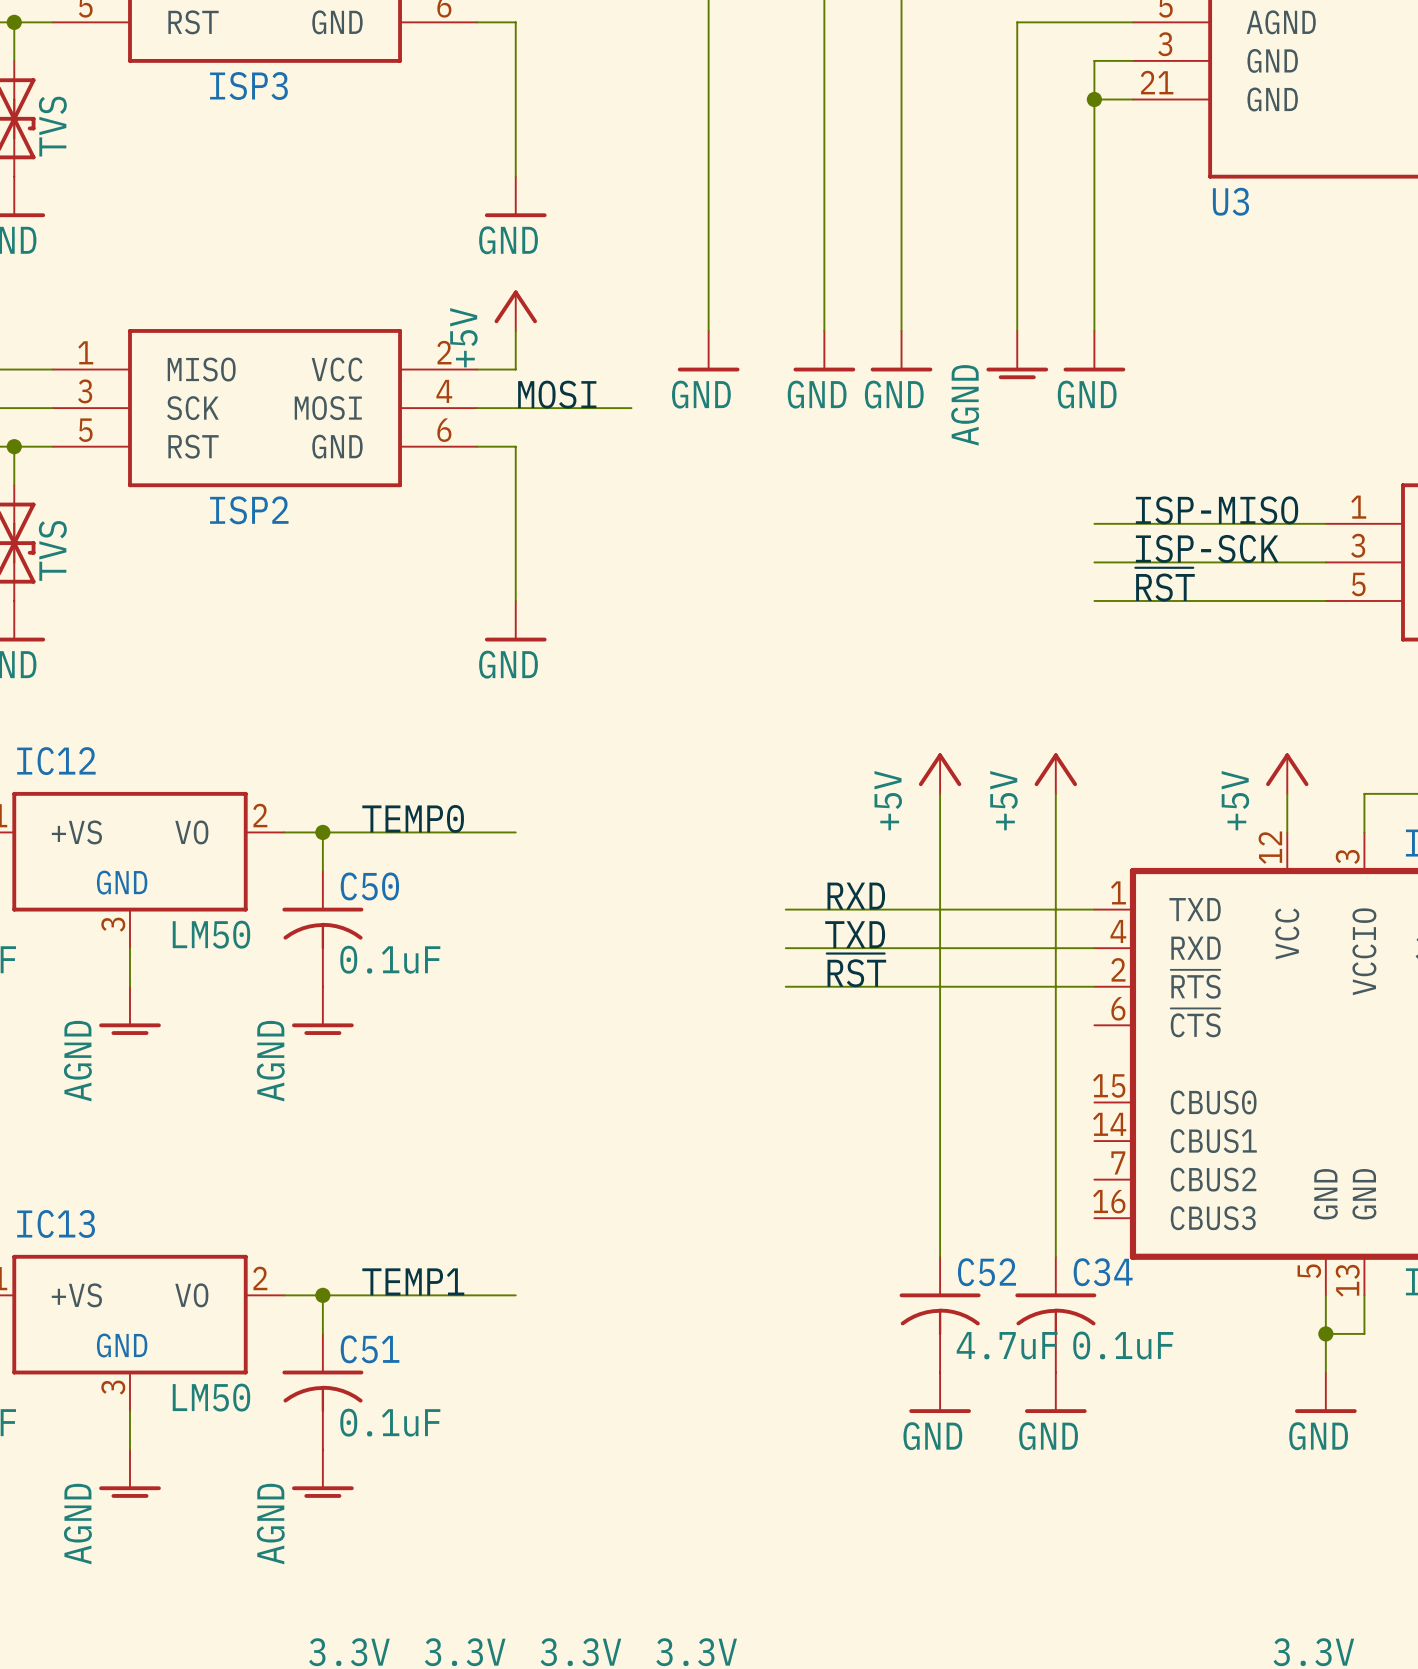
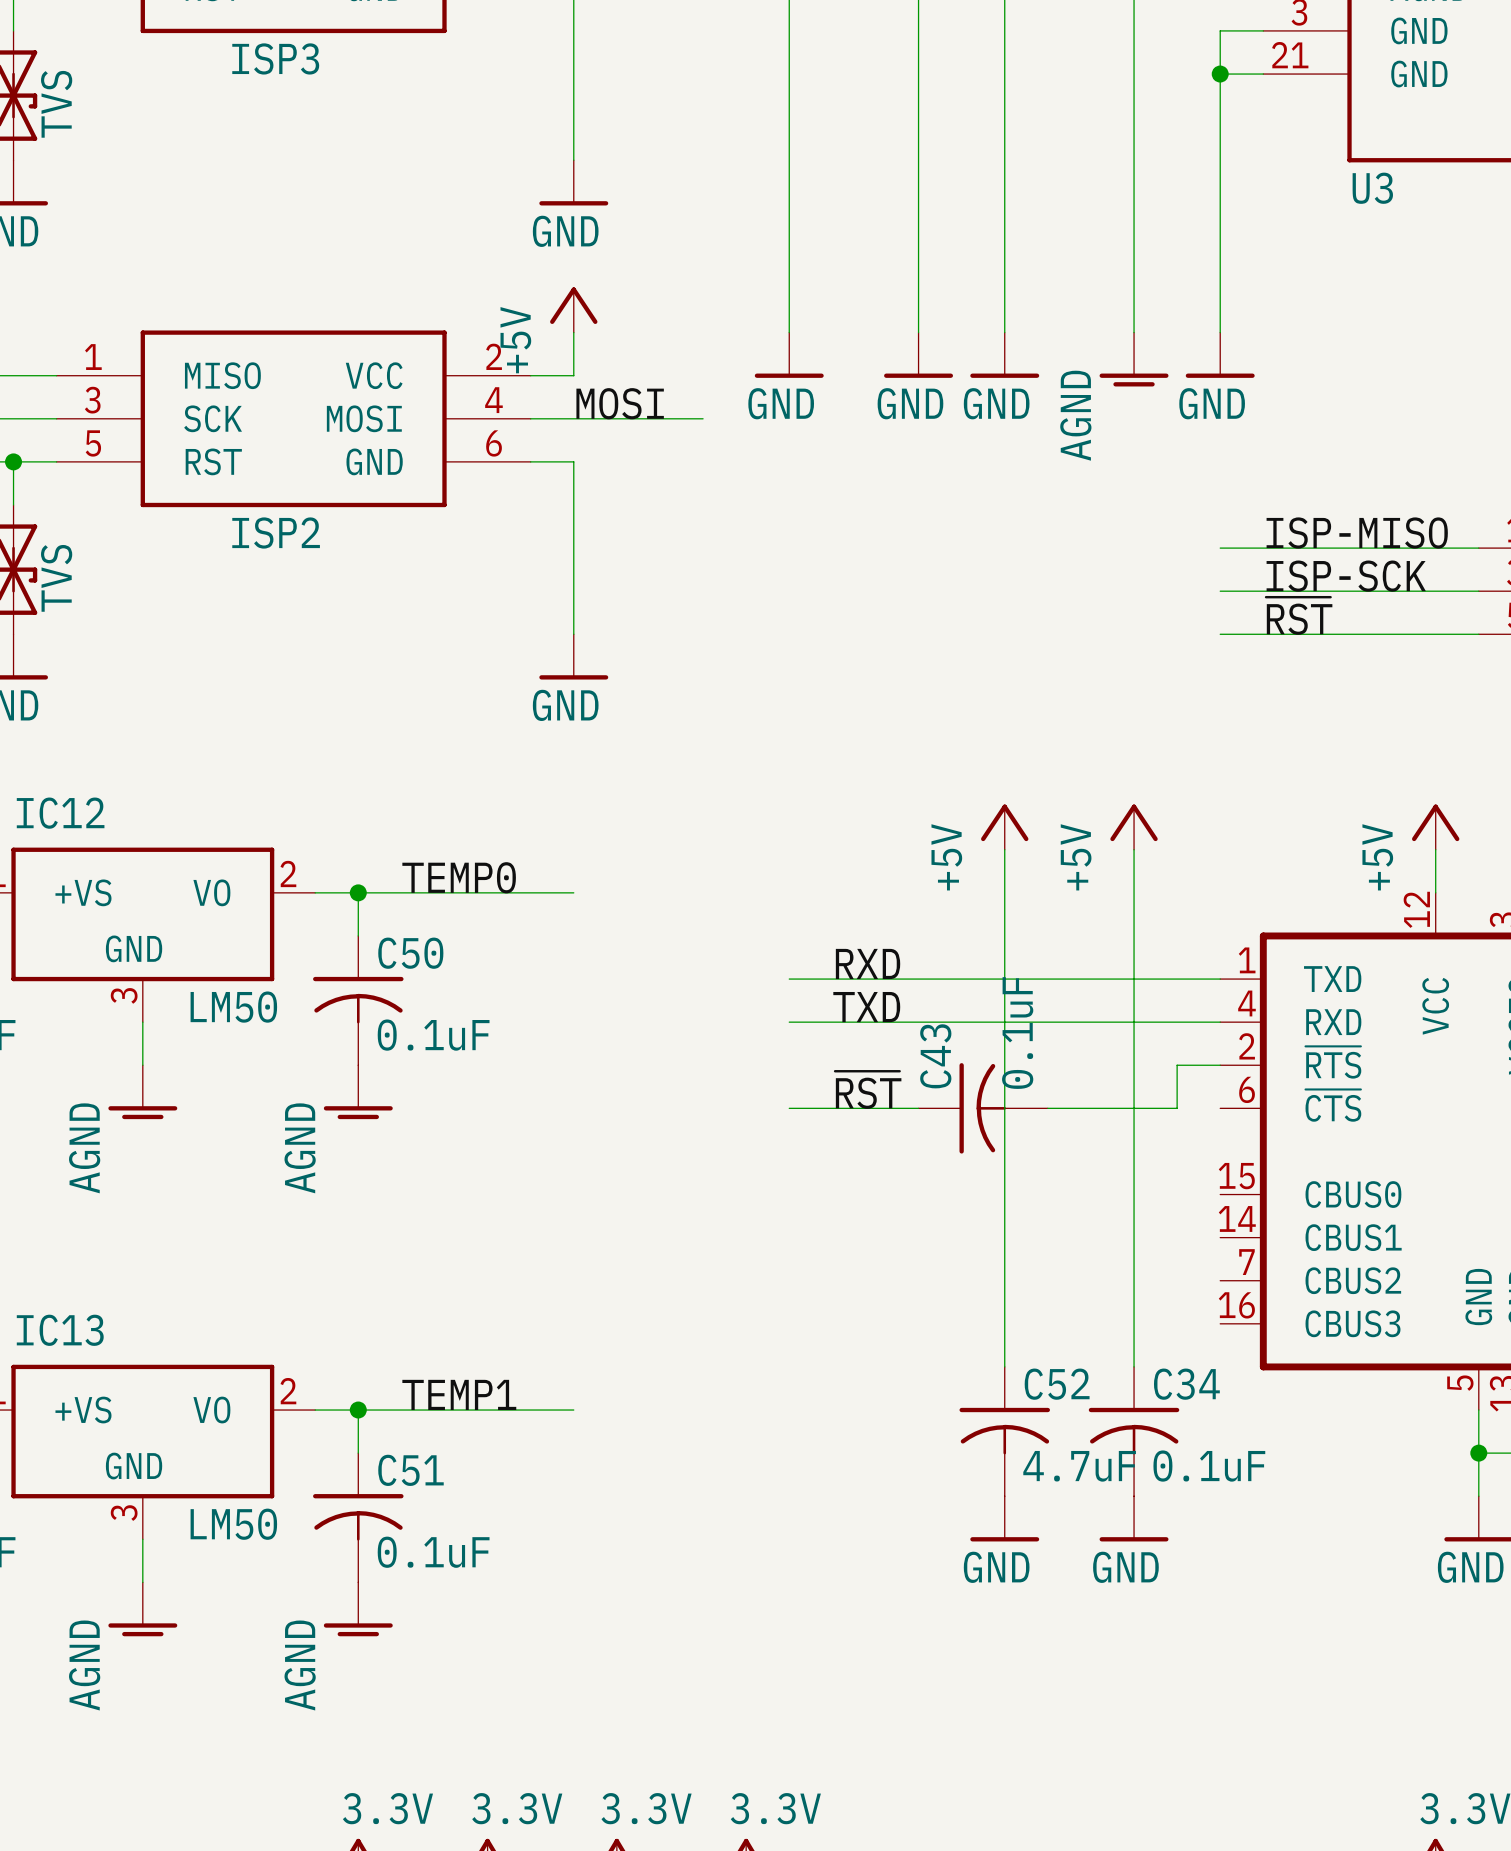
power symbol: none -> +5V (1004, 827)
power symbol: +5V (940, 773) -> none
power symbol: none -> +5V (1134, 827)
power symbol: +5V (1055, 773) -> none
wire: (940, 793) (940, 1256) -> (1004, 849) (1004, 1366)
wire: none -> (1134, 849) (1134, 1366)
wire: (1055, 793) (1055, 986) (785, 986) -> none
label position: RXD (856, 896) -> RXD (868, 963)
wire: none -> (789, 979) (875, 979)
label position: TXD (855, 934) -> TXD (866, 1007)
wire: none -> (789, 1022) (875, 1022)
label position: ~{RST} (856, 970) -> ~{RST} (868, 1090)
wire: none -> (789, 1108) (918, 1108)
C43: none -> 0.1uF (983, 1108)
wire: (1055, 1025) (1055, 1256) -> (1177, 1108) (1047, 1108)
C52 position: (940, 1314) -> (1004, 1431)
C34 position: (1055, 1314) -> (1134, 1431)
power symbol: none -> GND (1004, 1518)
power symbol: GND (940, 1392) -> none
power symbol: none -> GND (1134, 1518)
power symbol: GND (1055, 1392) -> none

